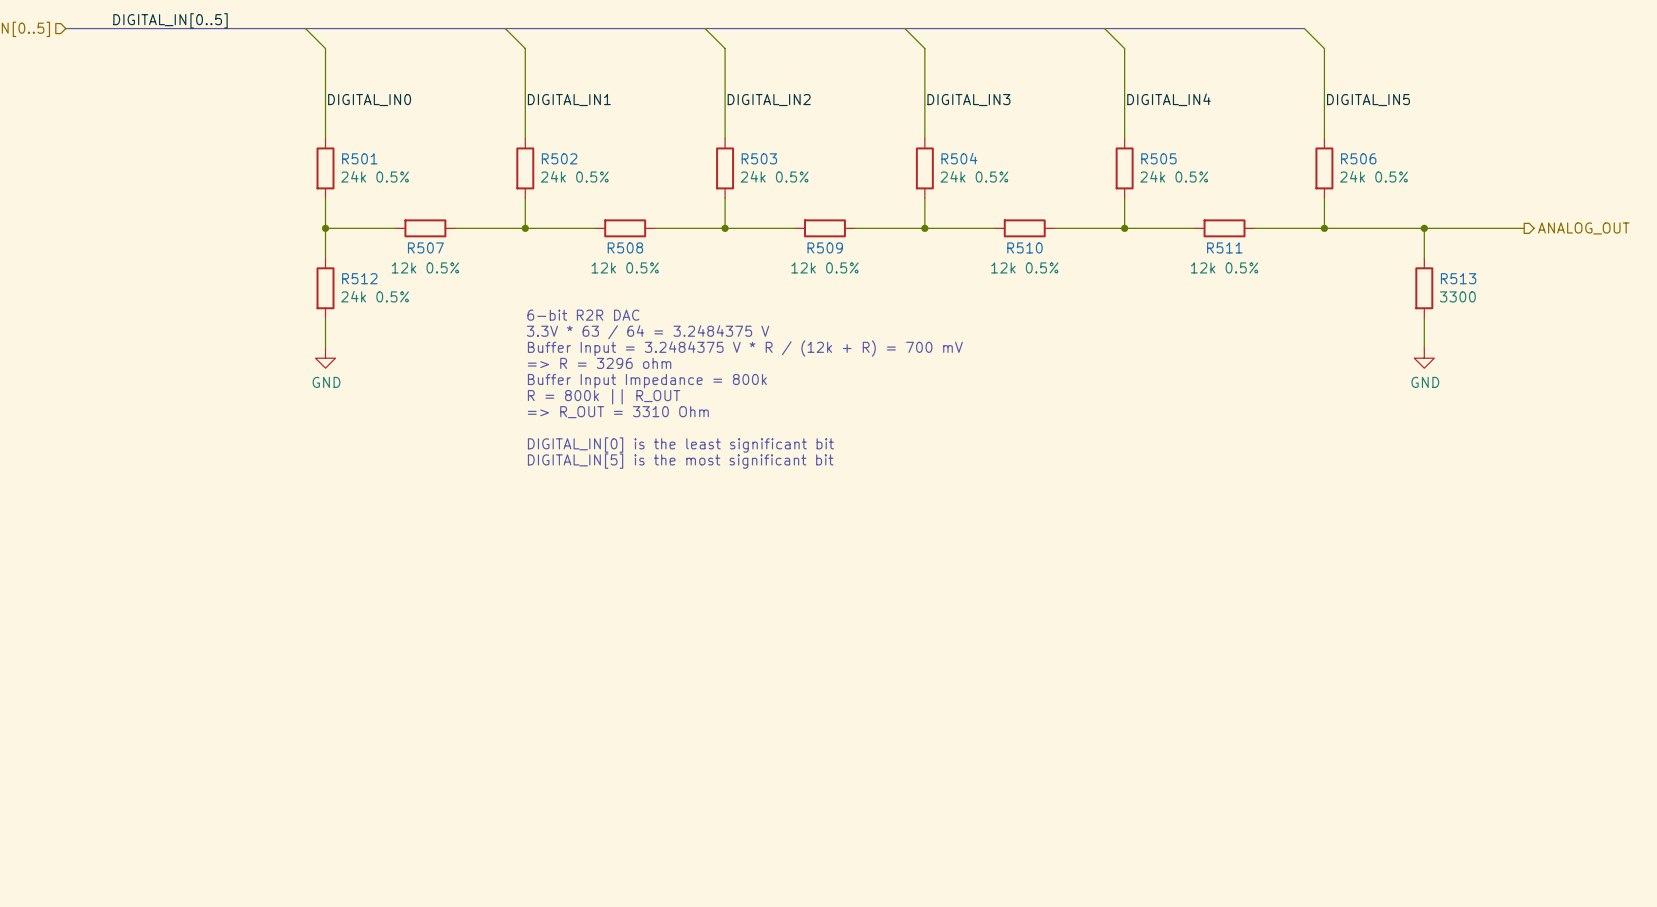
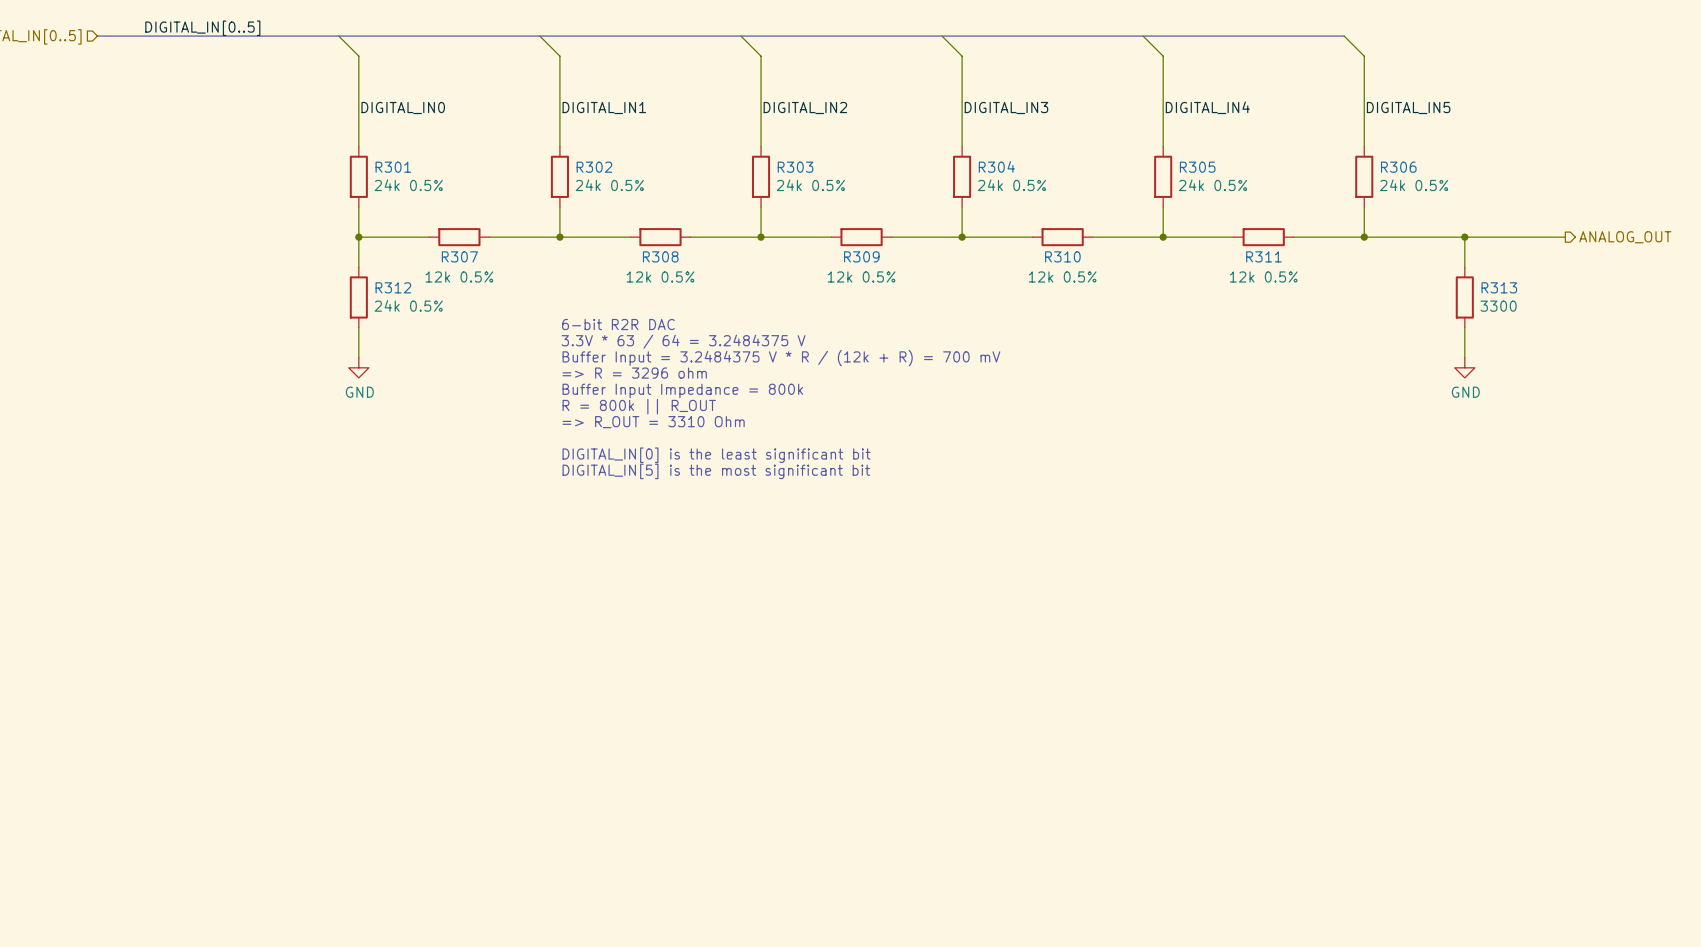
R501 name: R501 (359, 158) -> R301 (393, 167)
R502 name: R502 (559, 158) -> R302 (594, 167)
R503 name: R503 (759, 158) -> R303 (795, 167)
R504 name: R504 (959, 158) -> R304 (996, 166)
R505 name: R505 (1158, 158) -> R305 (1197, 167)
R506 name: R506 (1358, 158) -> R306 (1398, 167)
R507 name: R507 (425, 247) -> R307 (459, 256)
R508 name: R508 (625, 247) -> R308 (660, 256)
R509 name: R509 (825, 247) -> R309 (861, 256)
R510 name: R510 (1024, 247) -> R310 (1062, 256)
R511 name: R511 (1224, 247) -> R311 (1263, 256)
R512 name: R512 (359, 278) -> R312 (393, 287)
R513 name: R513 (1458, 278) -> R313 (1499, 287)

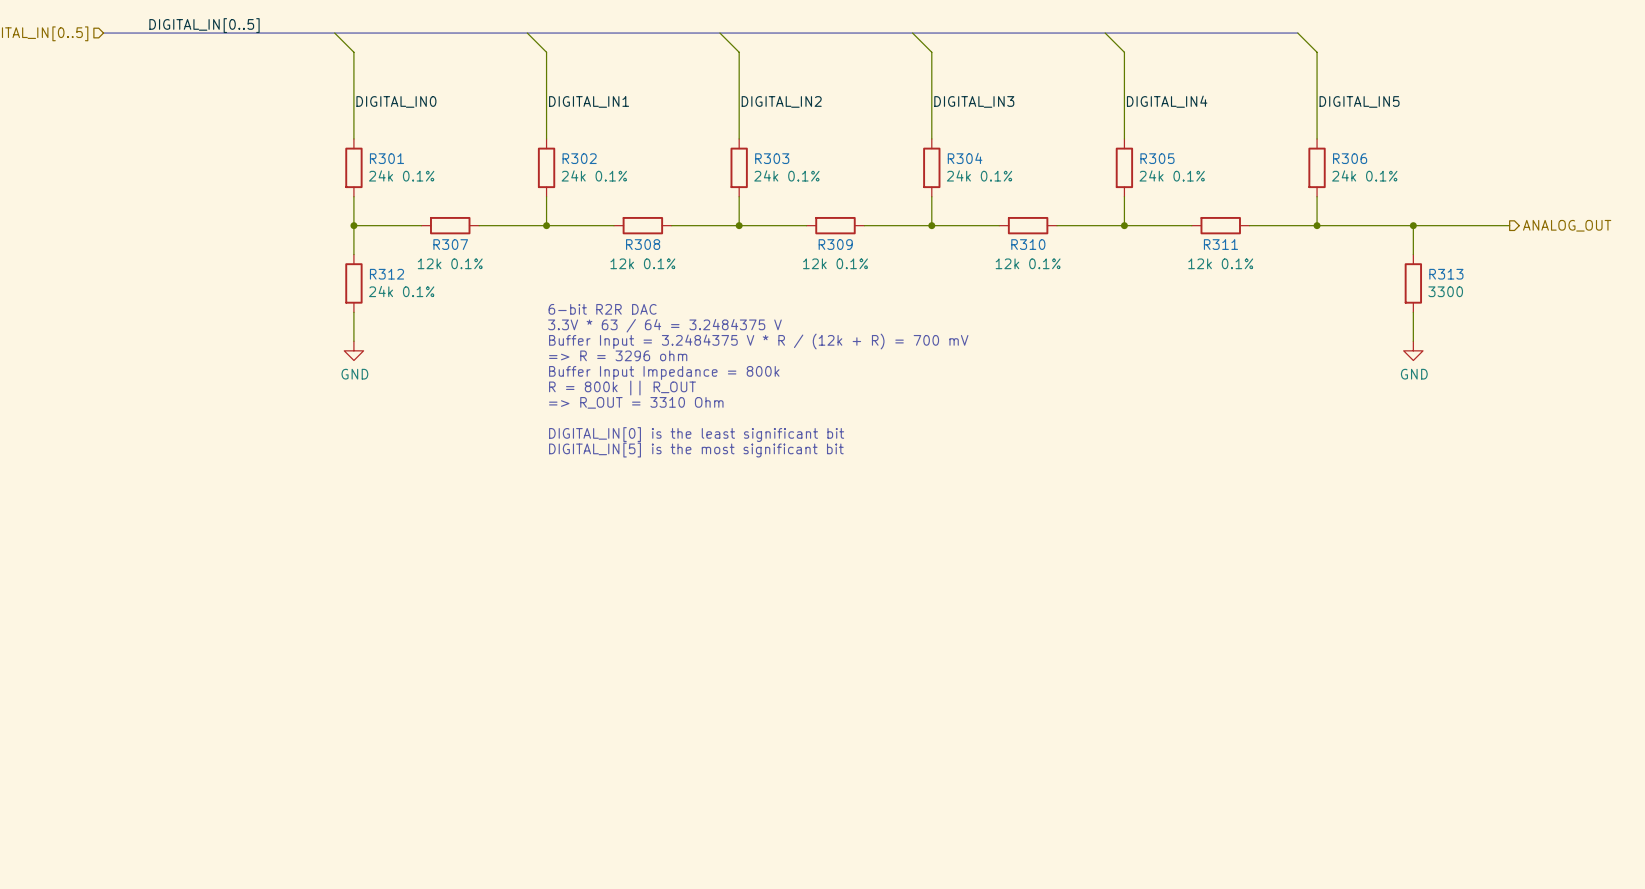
R301 value: 24k 0.5% (408, 185) -> 24k 0.1% (401, 175)
R302 value: 24k 0.5% (609, 185) -> 24k 0.1% (594, 175)
R303 value: 24k 0.5% (810, 185) -> 24k 0.1% (786, 175)
R304 value: 24k 0.5% (1011, 185) -> 24k 0.1% (979, 175)
R305 value: 24k 0.5% (1213, 185) -> 24k 0.1% (1172, 175)
R306 value: 24k 0.5% (1414, 185) -> 24k 0.1% (1364, 175)
R307 value: 12k 0.5% (459, 276) -> 12k 0.1% (450, 263)
R308 value: 12k 0.5% (660, 276) -> 12k 0.1% (642, 263)
R309 value: 12k 0.5% (861, 276) -> 12k 0.1% (835, 263)
R310 value: 12k 0.5% (1062, 276) -> 12k 0.1% (1028, 263)
R311 value: 12k 0.5% (1263, 276) -> 12k 0.1% (1220, 263)
R312 value: 24k 0.5% (408, 305) -> 24k 0.1% (401, 291)

